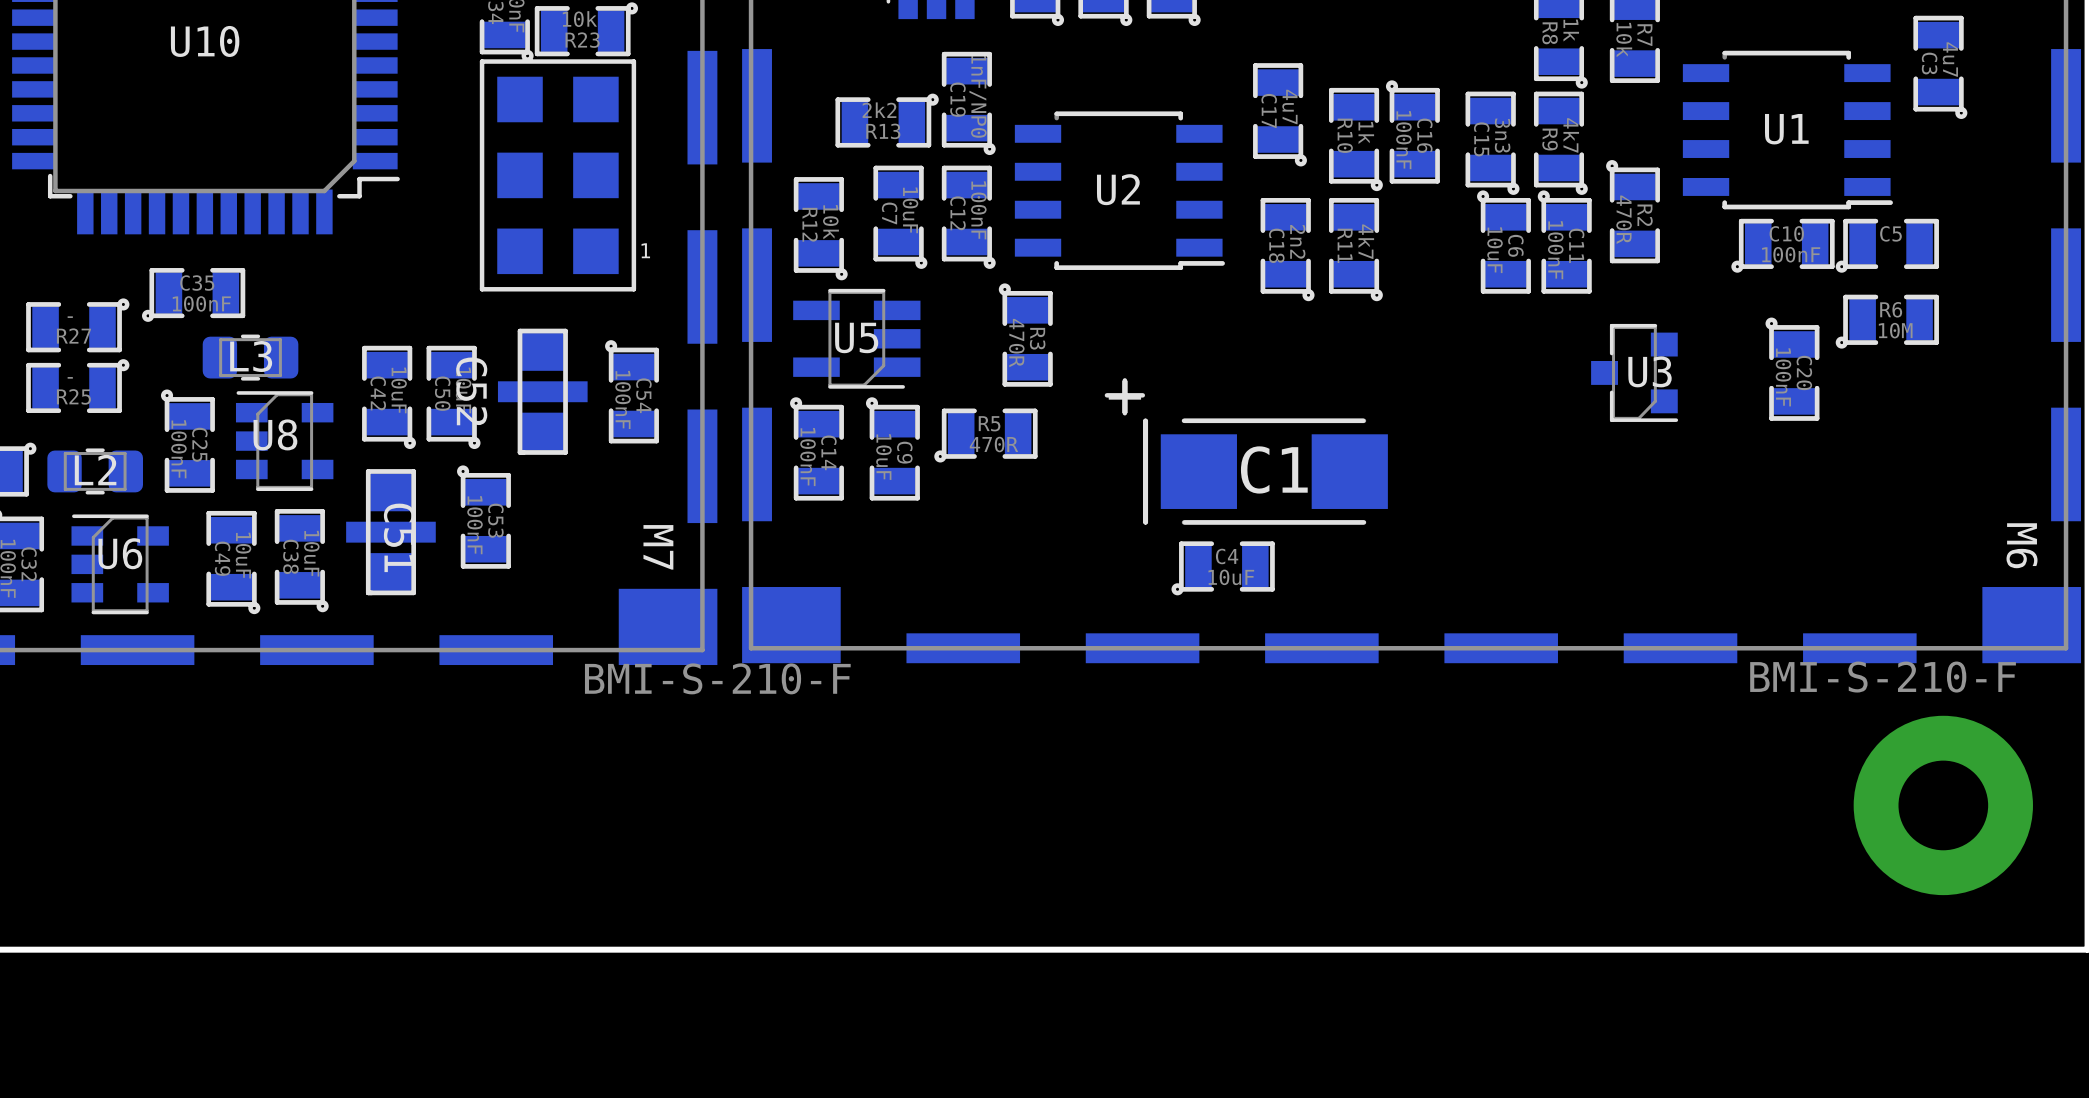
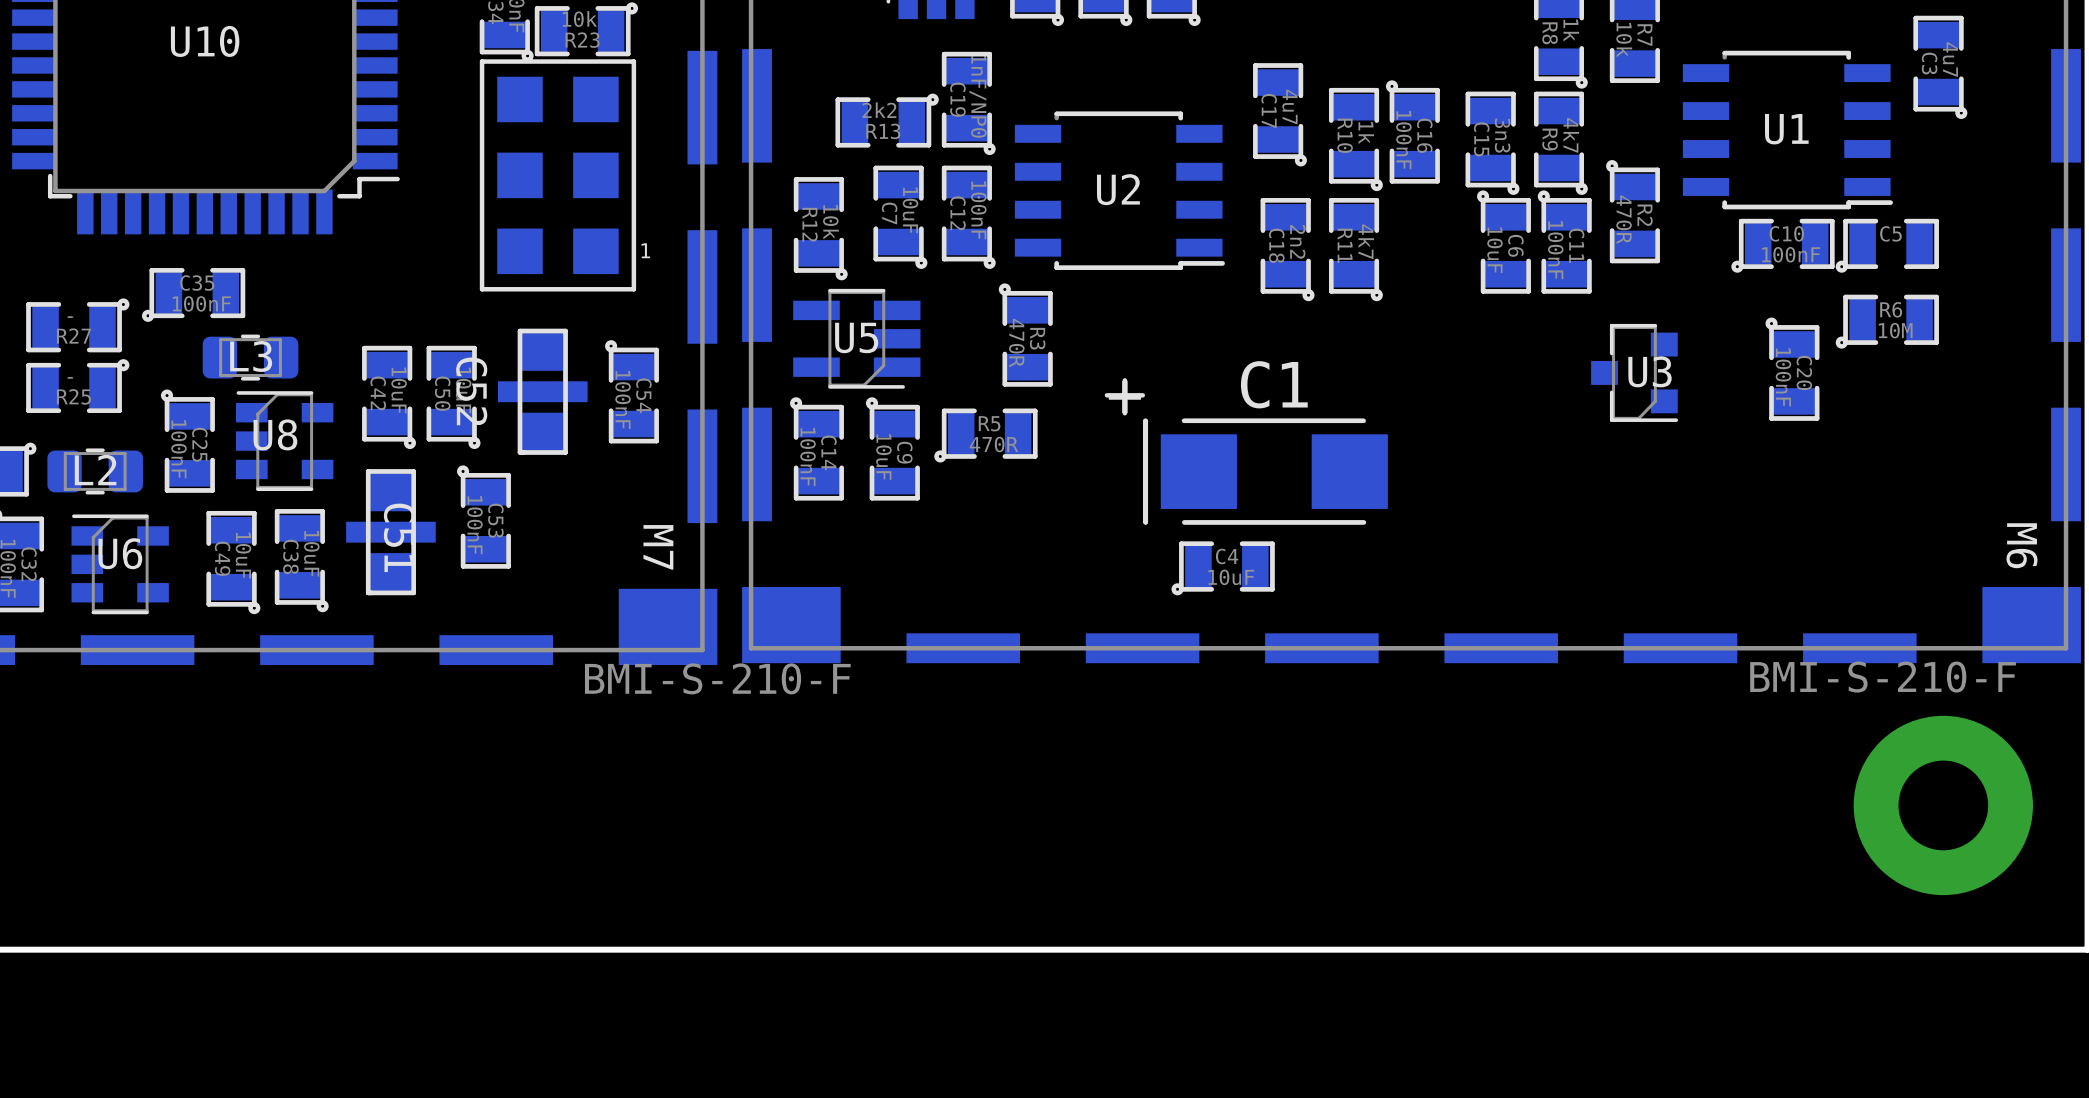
C1 footprint: [1104, 378, 1388, 525] -> [1104, 378, 1388, 525]
C1 name position: C1 (1274, 469) -> C1 (1274, 384)

